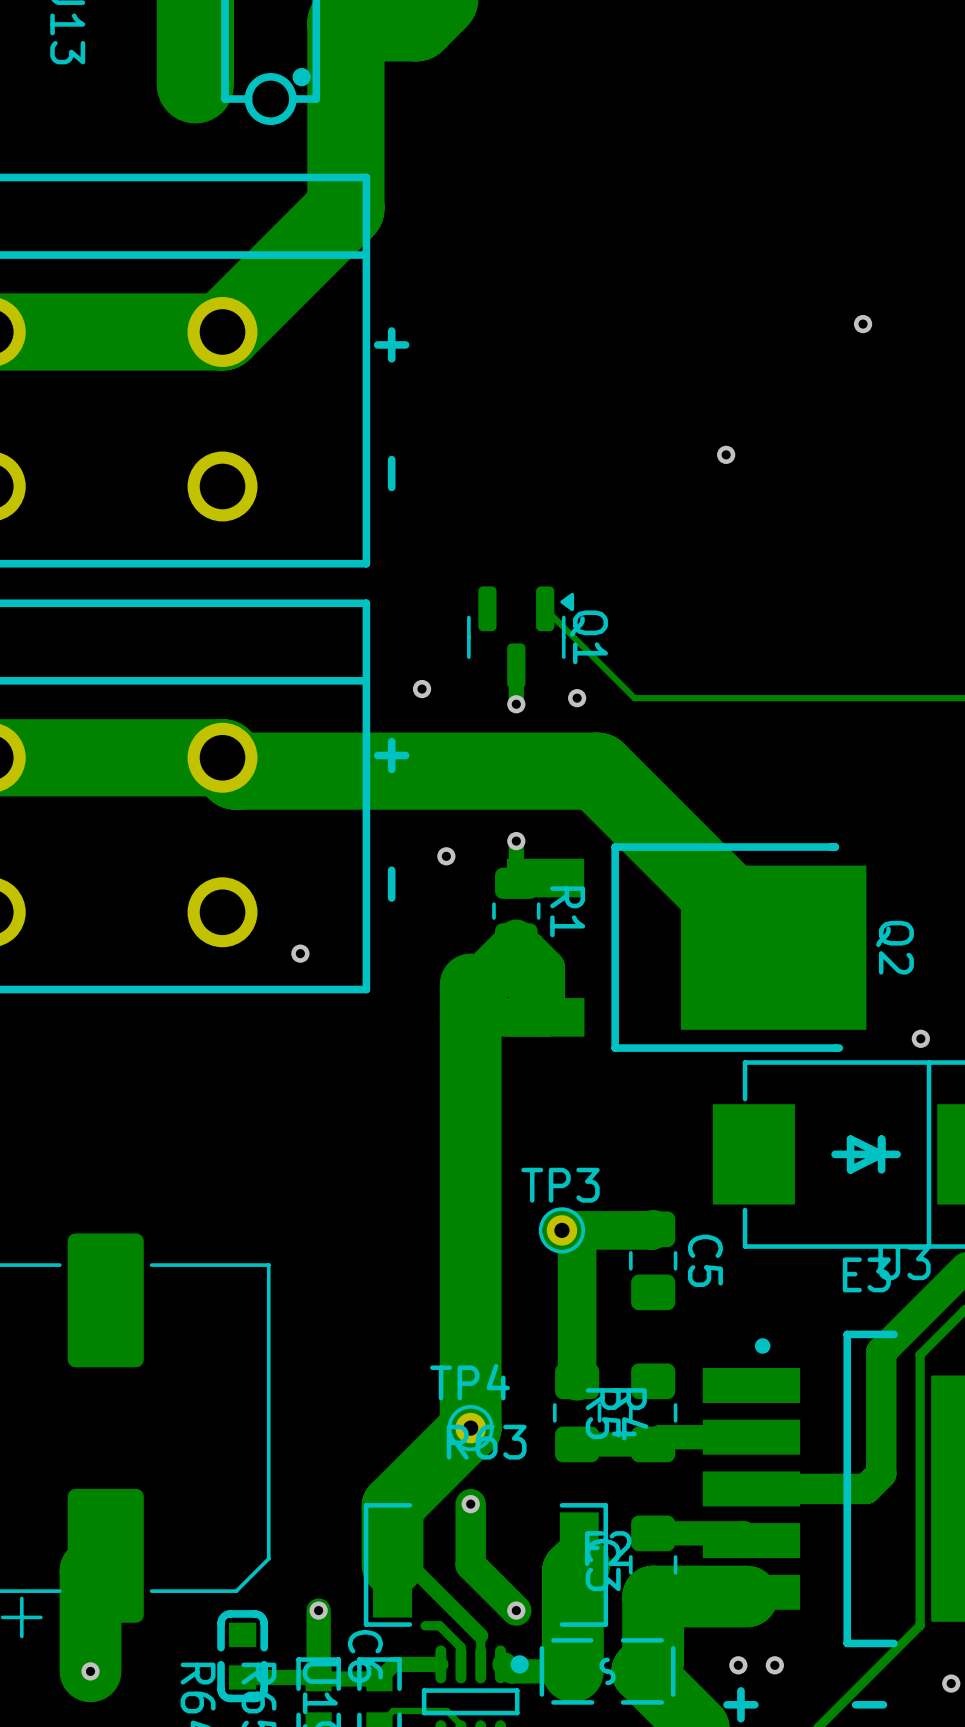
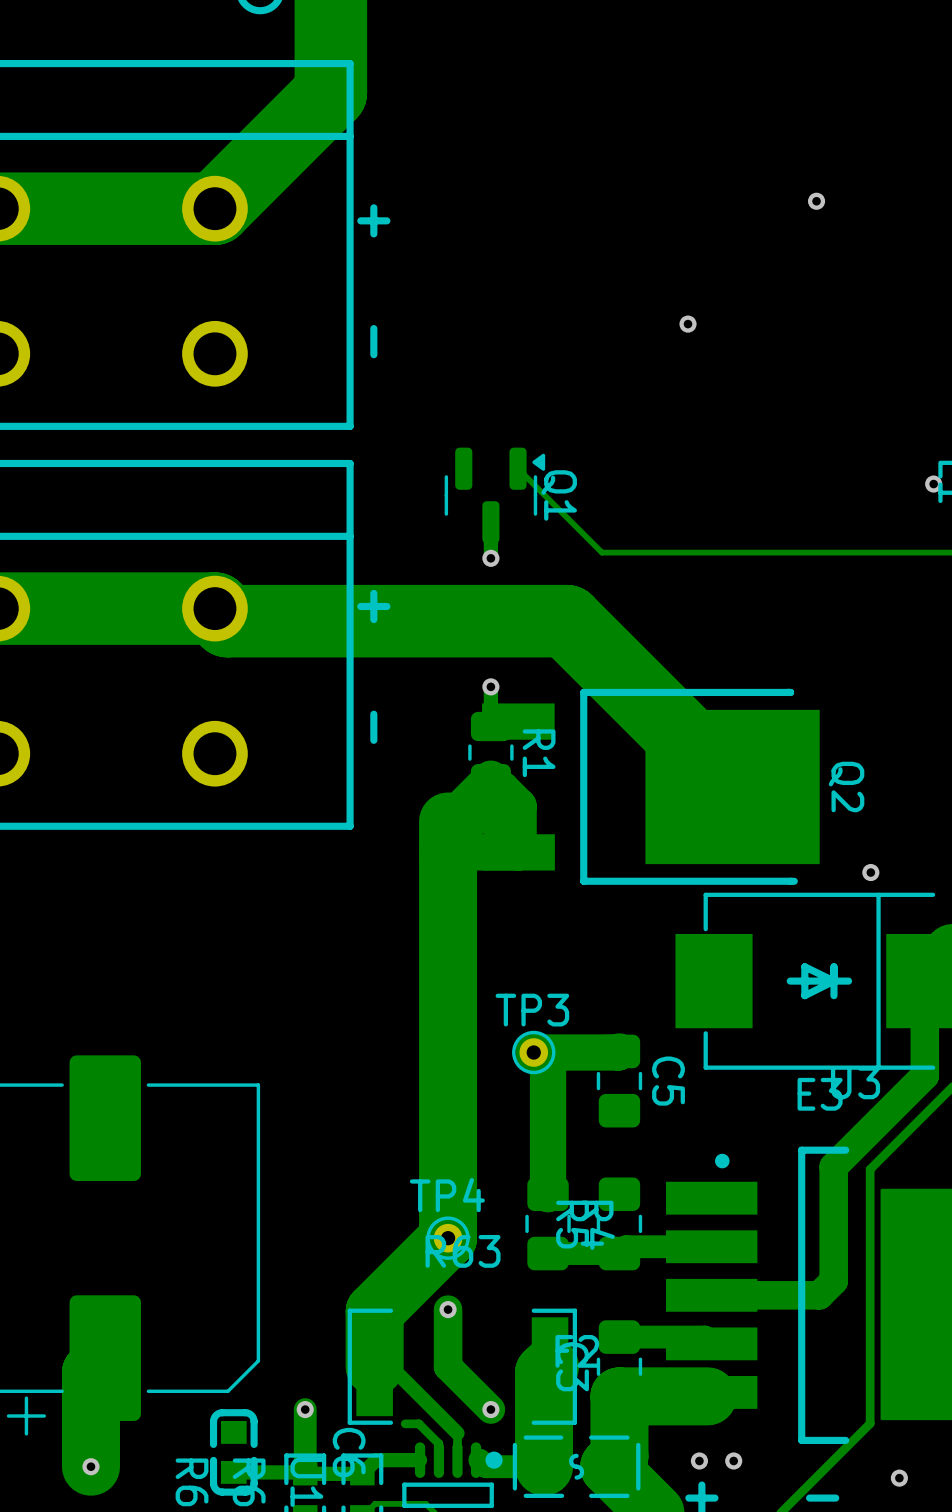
via: (422, 689) -> none
via: (577, 698) -> none
via: (446, 856) -> none
via: (300, 953) -> none

